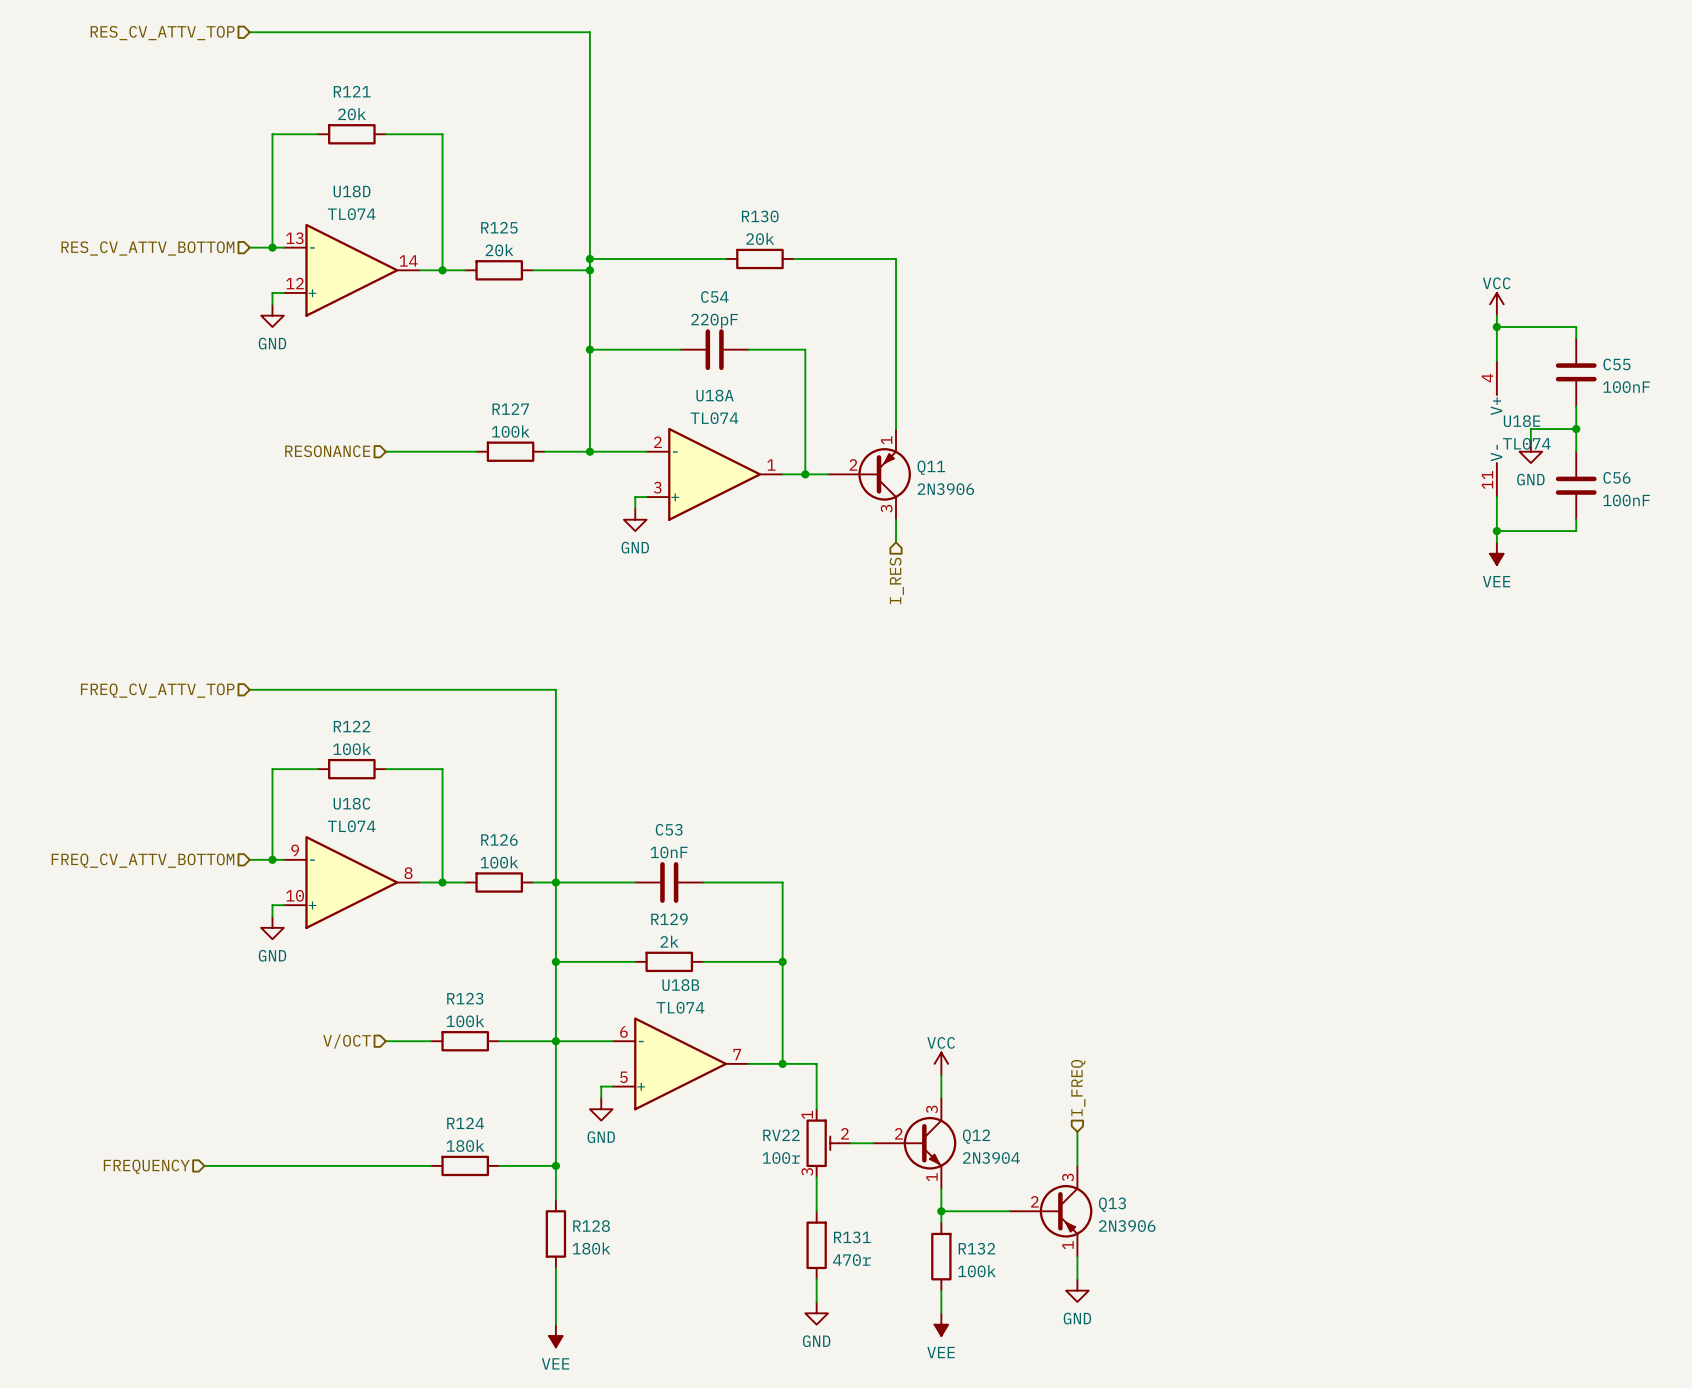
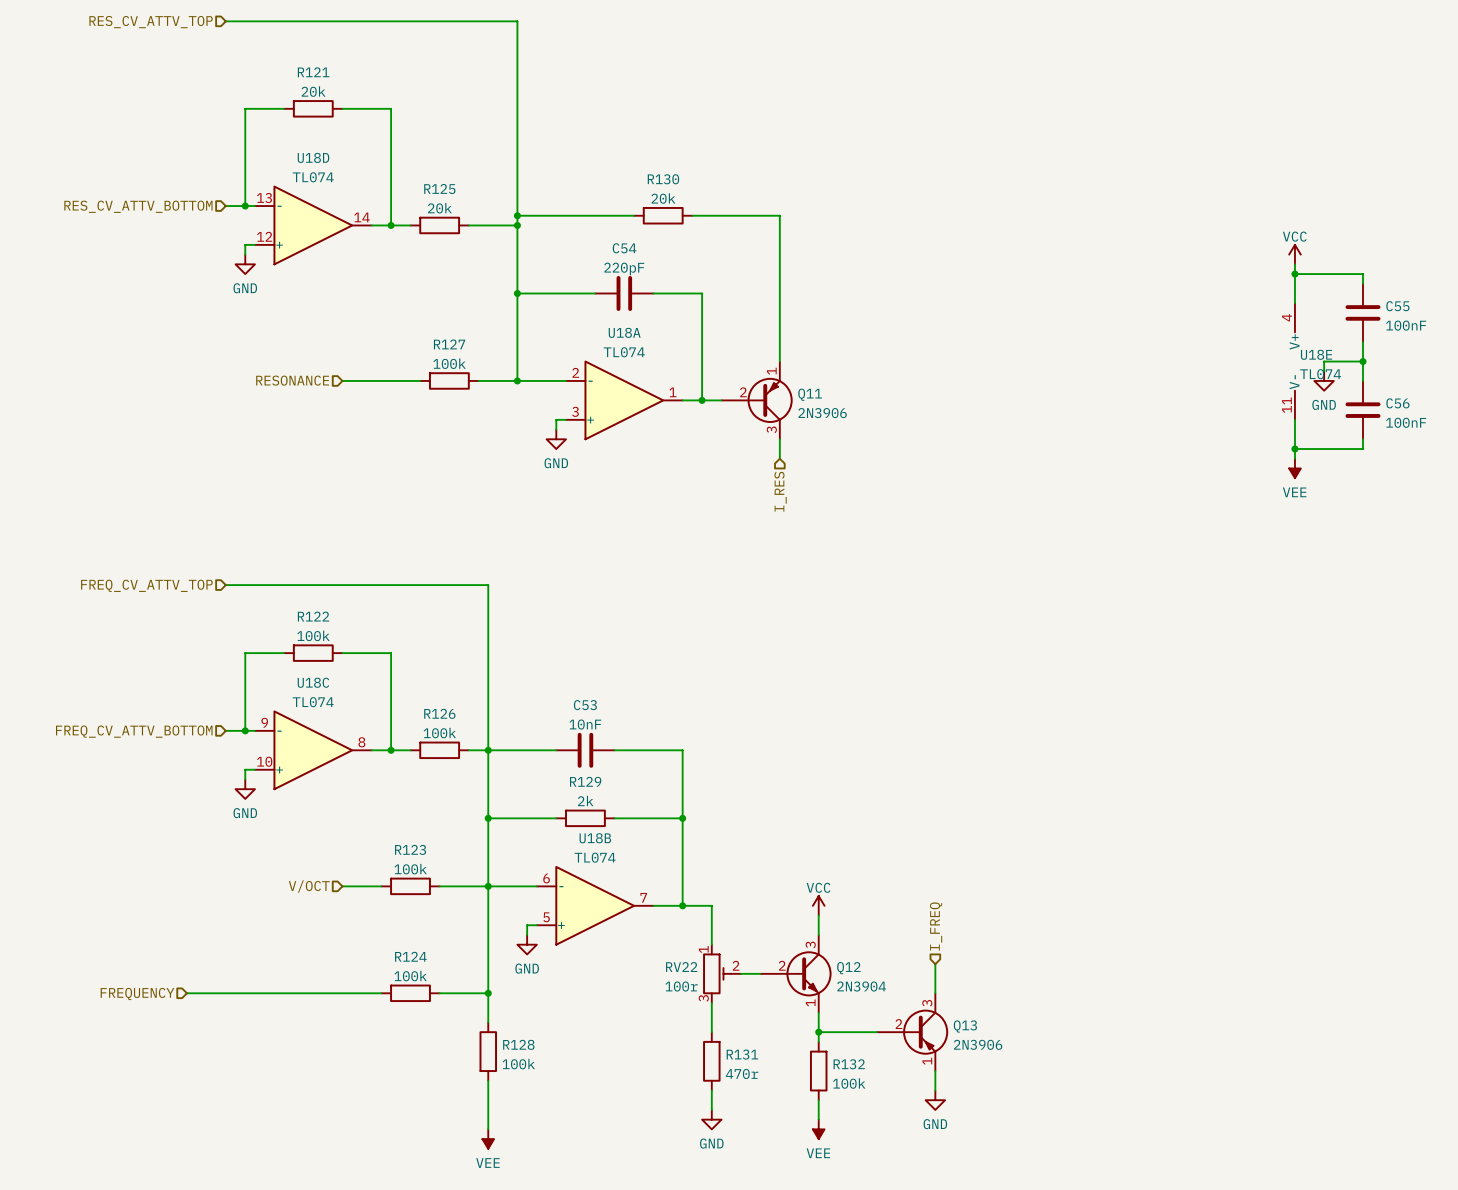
R124 value: 180k (465, 1145) -> 100k (410, 976)
R128 value: 180k (591, 1248) -> 100k (518, 1064)

